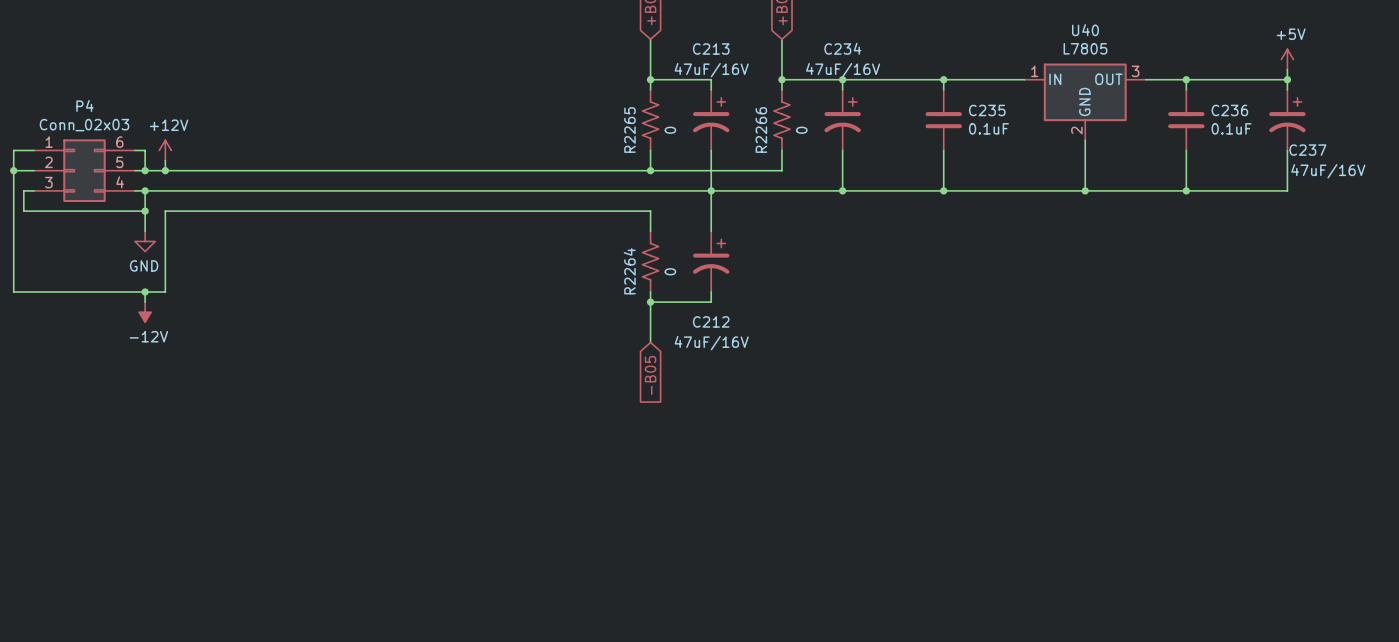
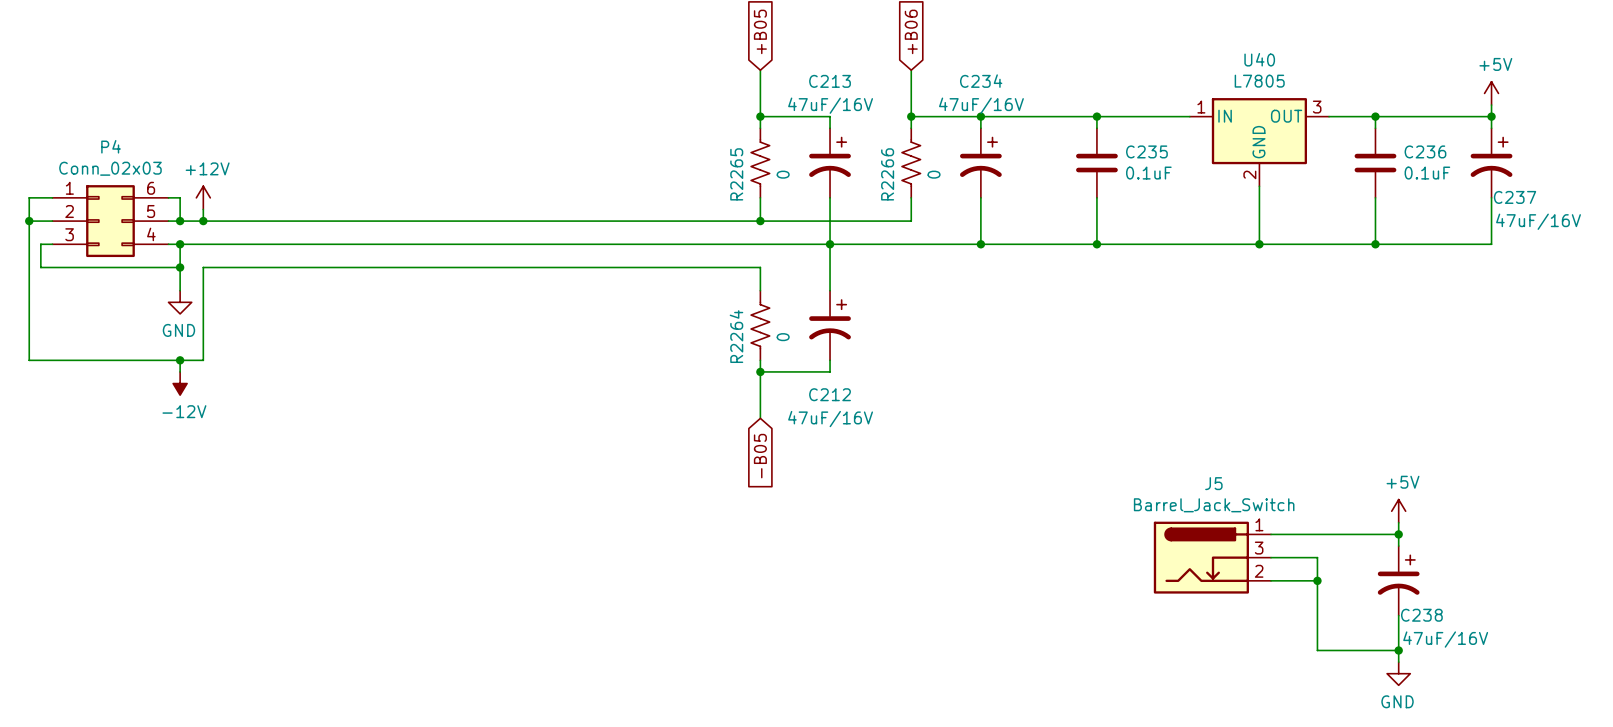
power symbol: none -> +5V (1398, 511)
wire: none -> (1398, 522) (1398, 546)
wire: none -> (1271, 534) (1398, 534)
junction: none -> (1398, 534)
J5: none -> Barrel_Jack_Switch (1212, 557)
wire: none -> (1271, 557) (1317, 557) (1317, 650) (1398, 650)
wire: none -> (1271, 580) (1317, 580)
junction: none -> (1317, 580)
C238: none -> 47uF/16V (1398, 580)
wire: none -> (1398, 615) (1398, 662)
junction: none -> (1398, 650)
power symbol: none -> GND (1398, 673)

